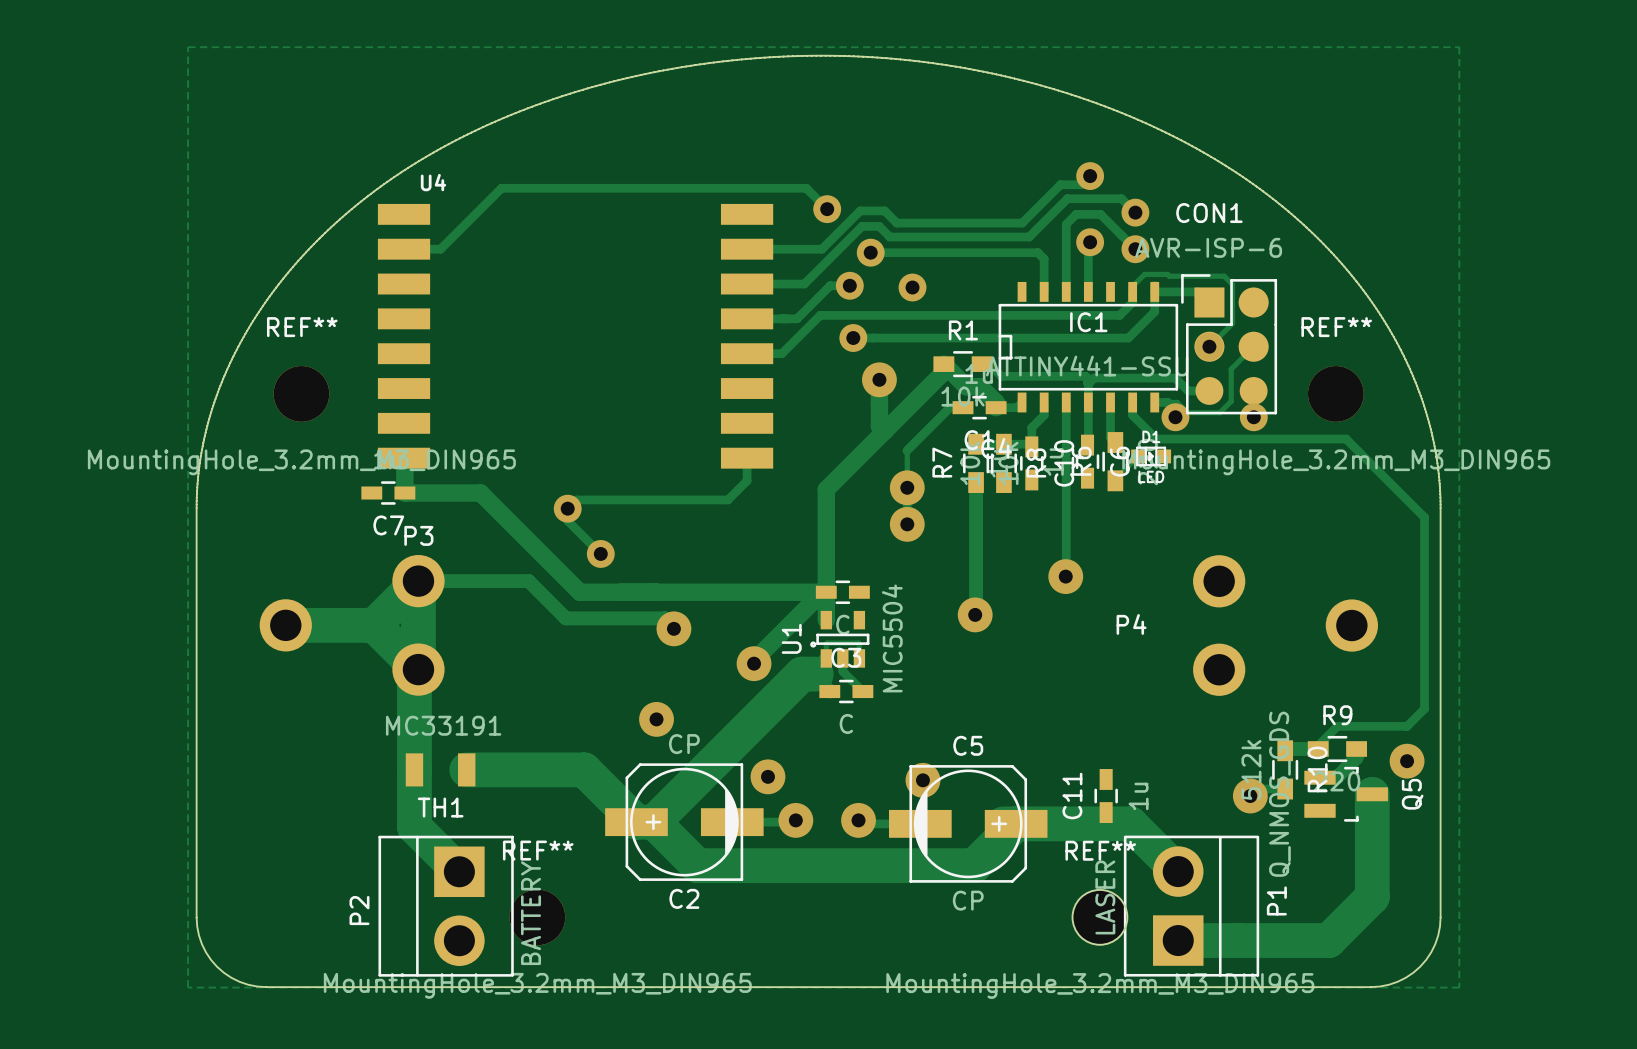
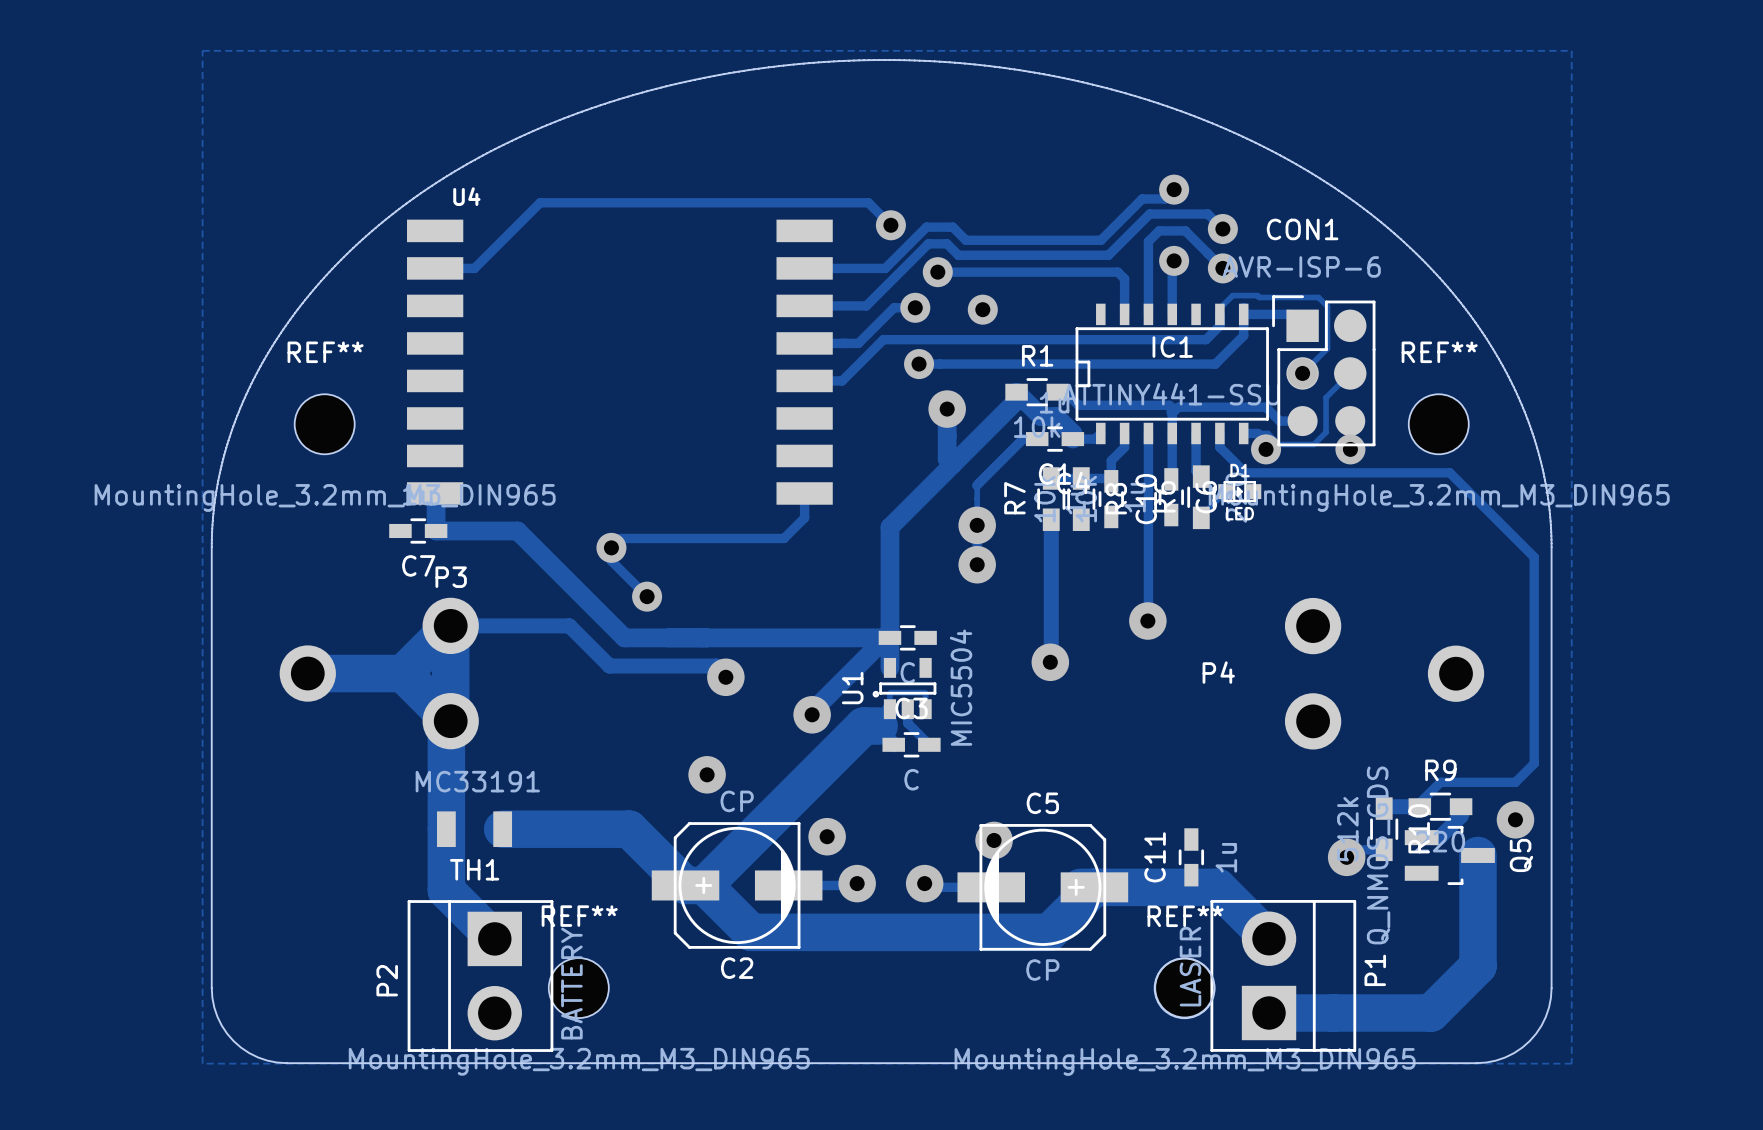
REF** footprint: [273, 366, 330, 422] -> [294, 394, 355, 455]
REF** footprint: [1307, 366, 1364, 422] -> [1408, 394, 1469, 455]
REF** footprint: [509, 889, 566, 946] -> [548, 958, 609, 1019]
REF** footprint: [1072, 889, 1128, 946] -> [1154, 958, 1215, 1019]

